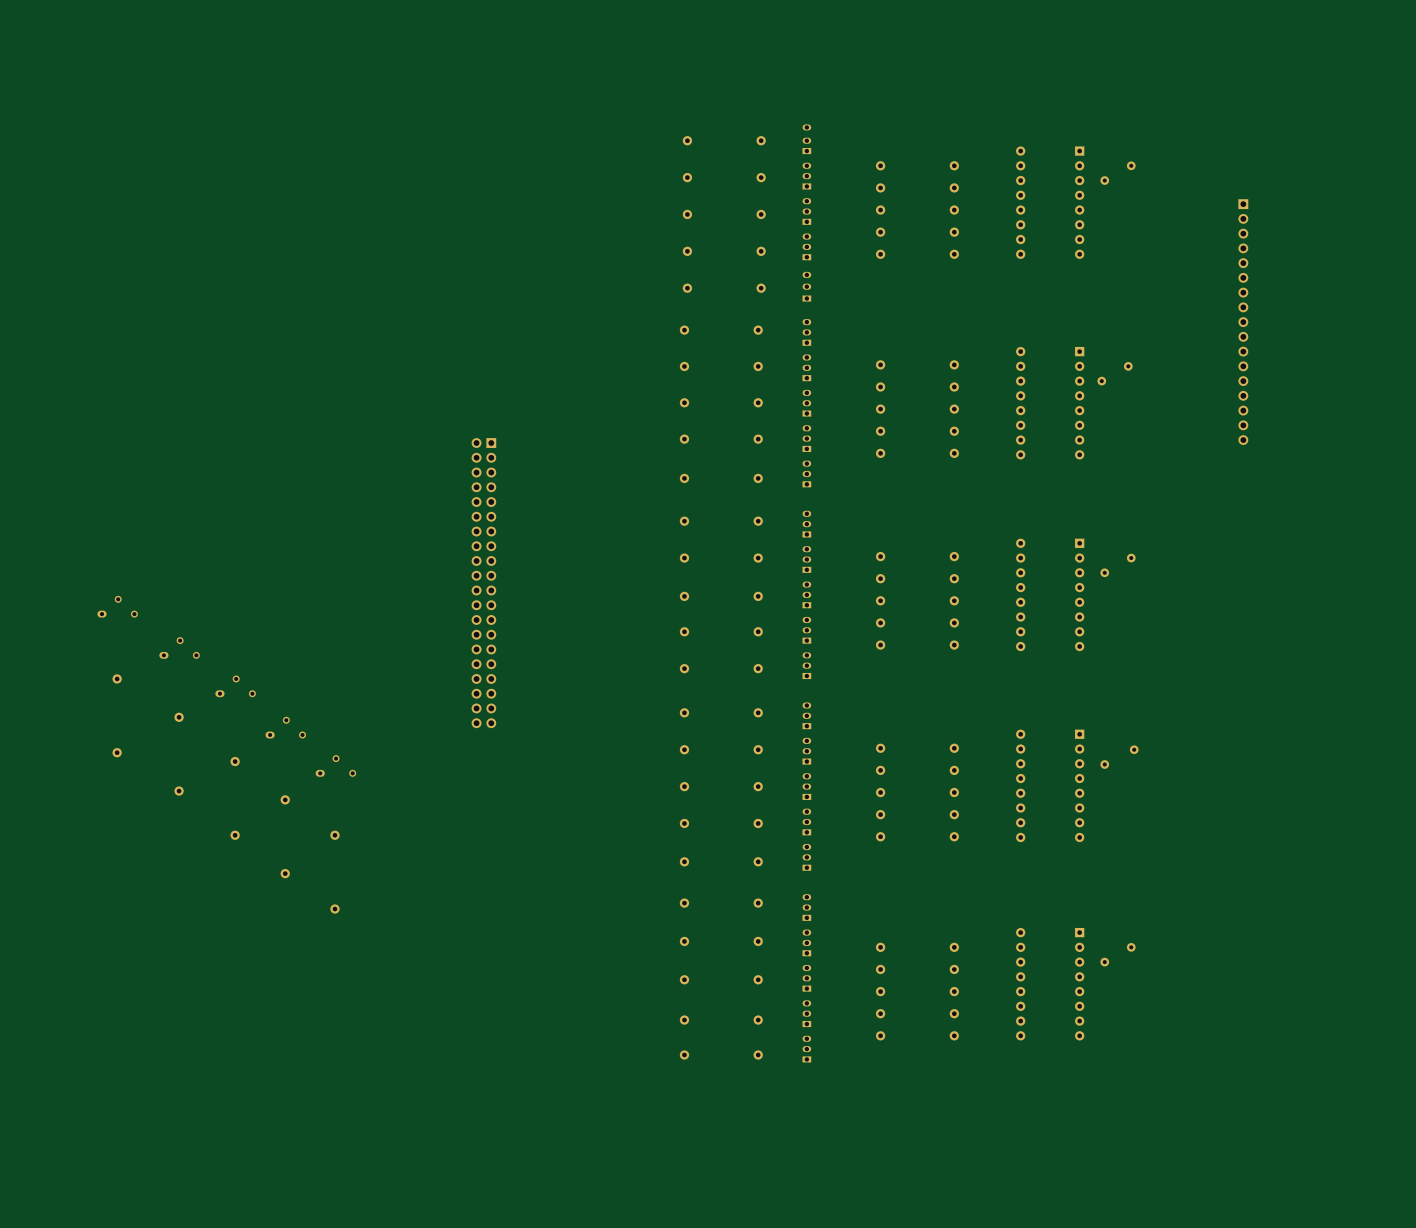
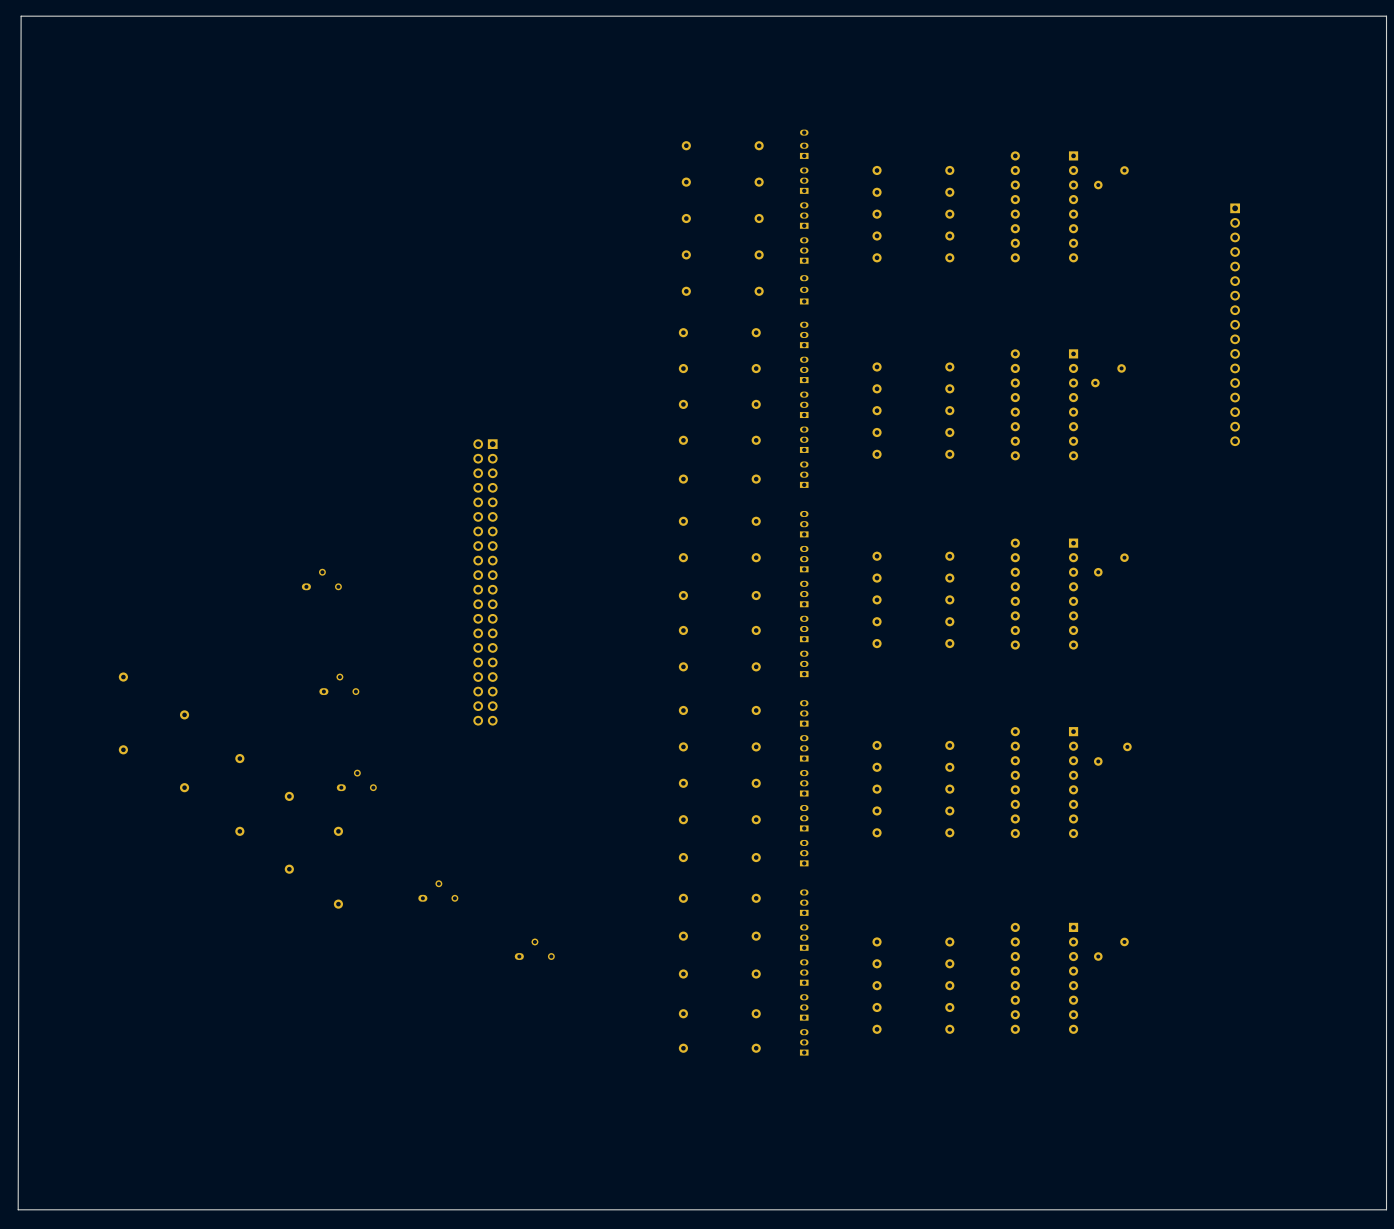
board edge: none -> (1386, 16) (21, 16) (18, 1209) (1386, 1209) (1386, 16)
part: none -> (321, 579)
part: (117, 606) -> none
part: (179, 648) -> none
part: (235, 686) -> none
part: none -> (339, 684)
part: (285, 727) -> none
part: (335, 765) -> none
part: none -> (356, 780)
part: none -> (438, 891)
part: none -> (534, 949)

